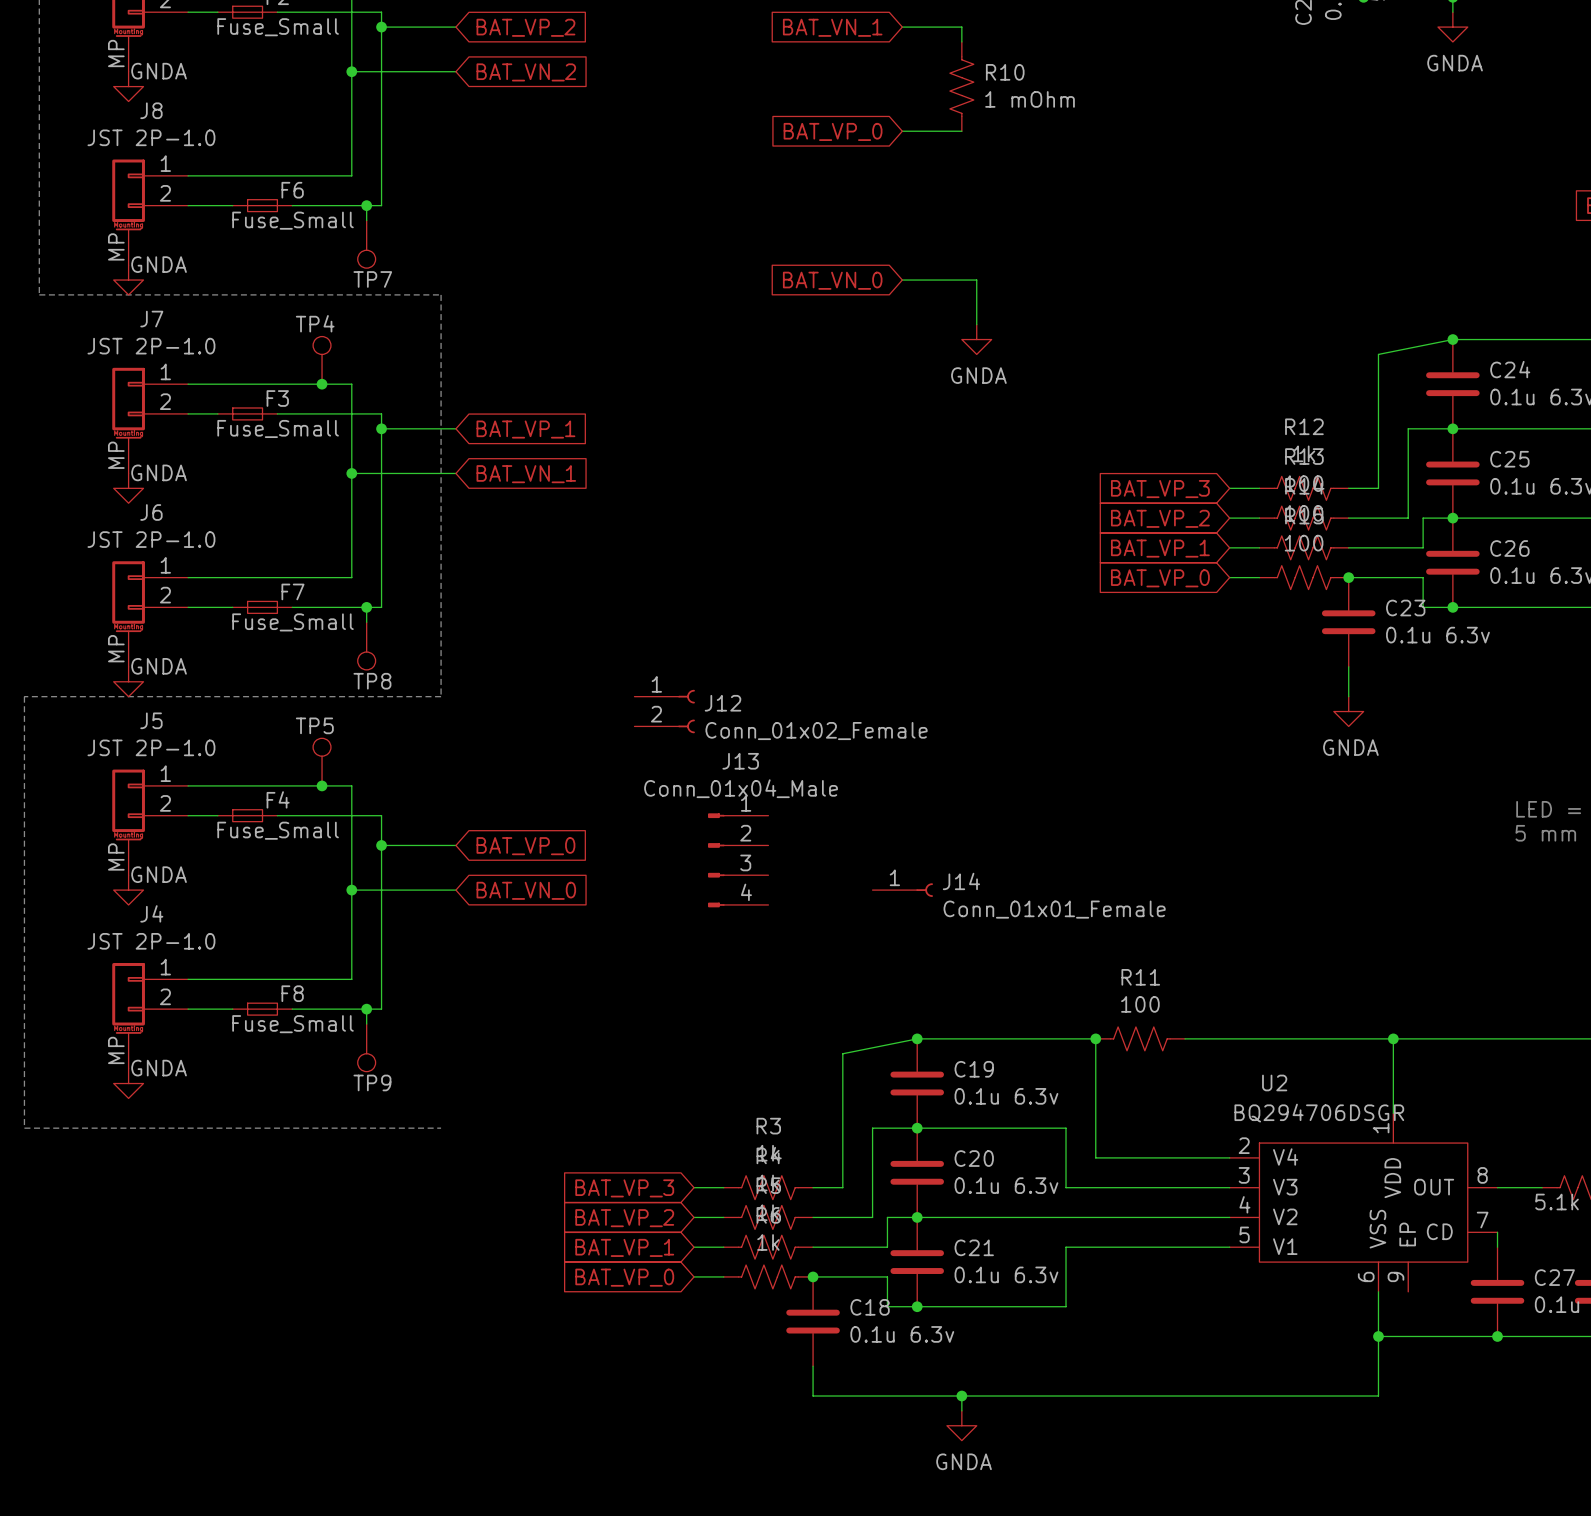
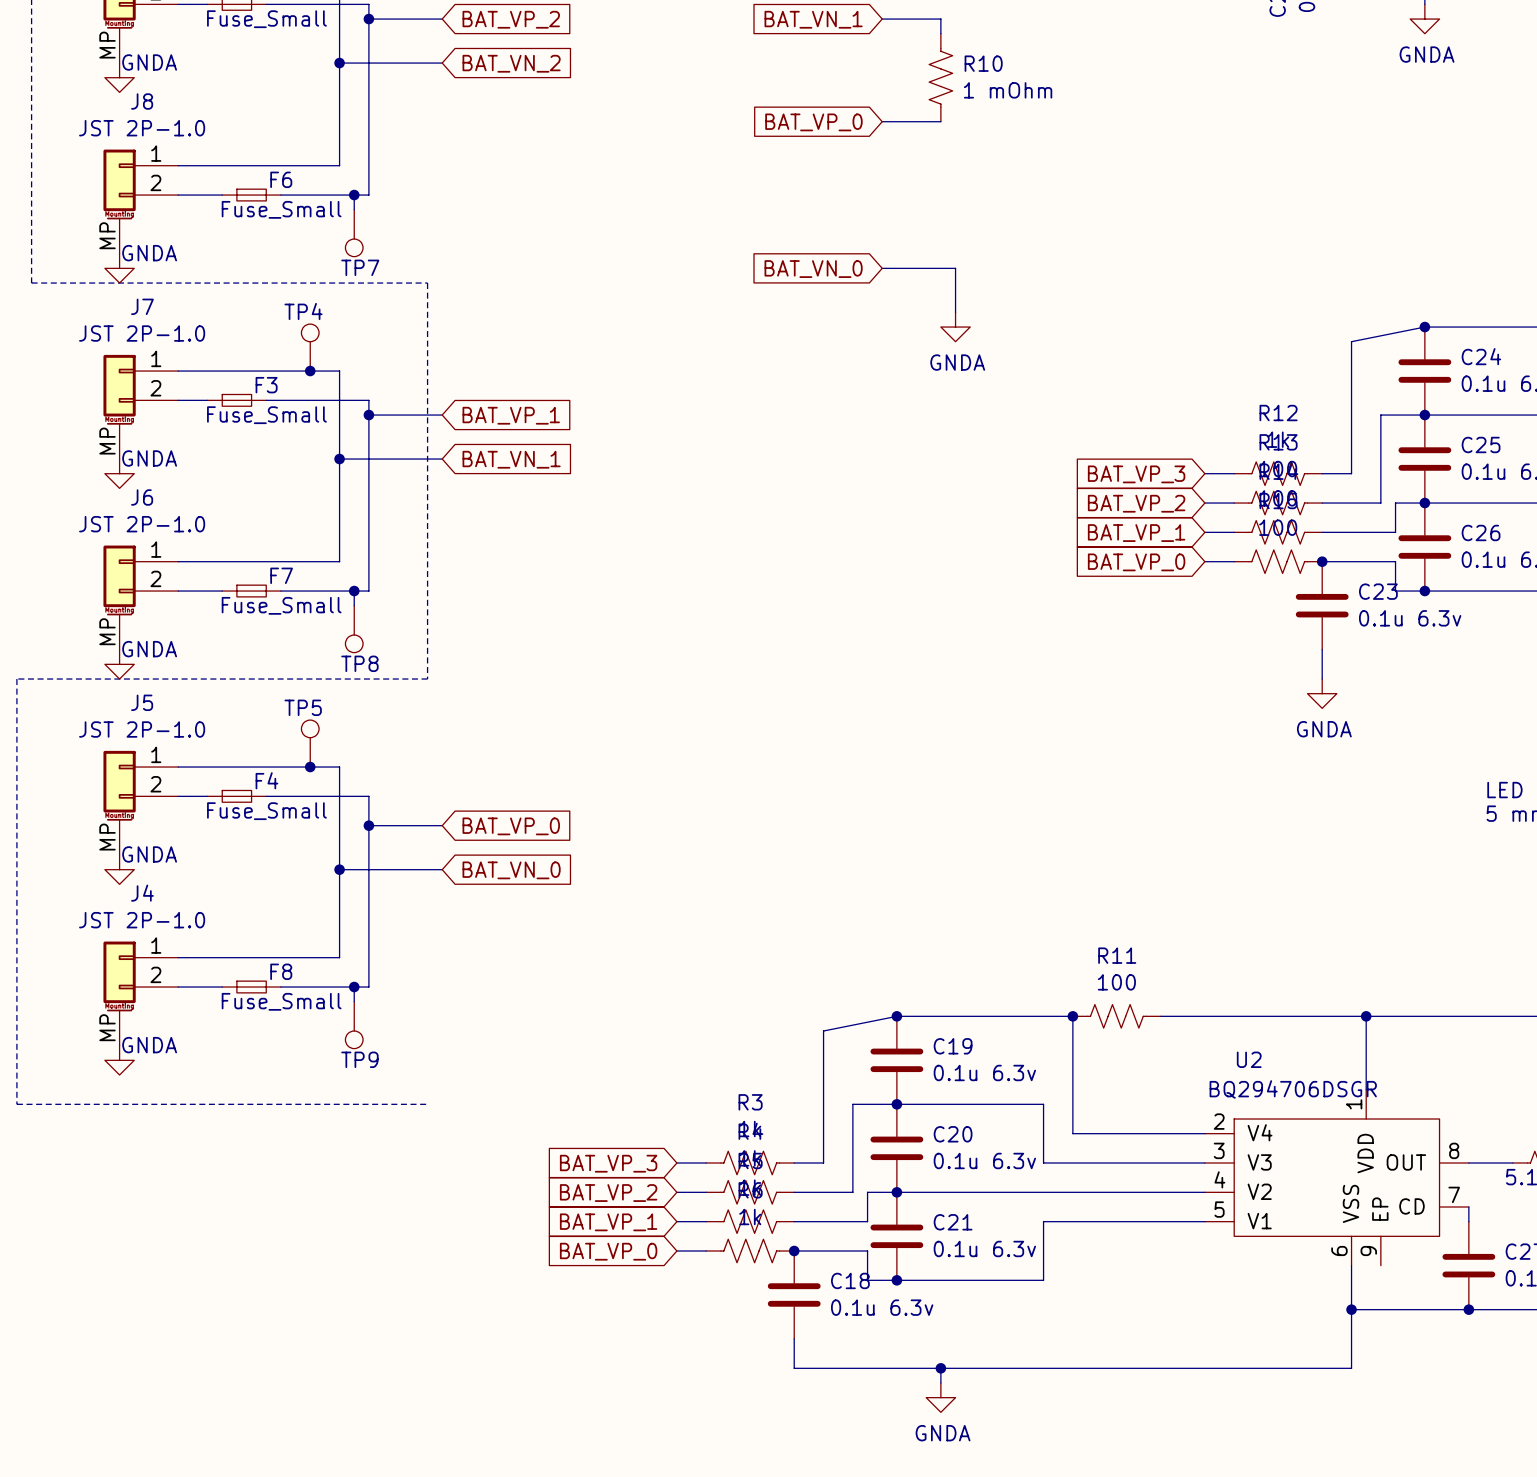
J12: Conn_01x02_Female (664, 711) -> none
J13: Conn_01x04_Male (738, 860) -> none
J14: Conn_01x01_Female (902, 890) -> none

